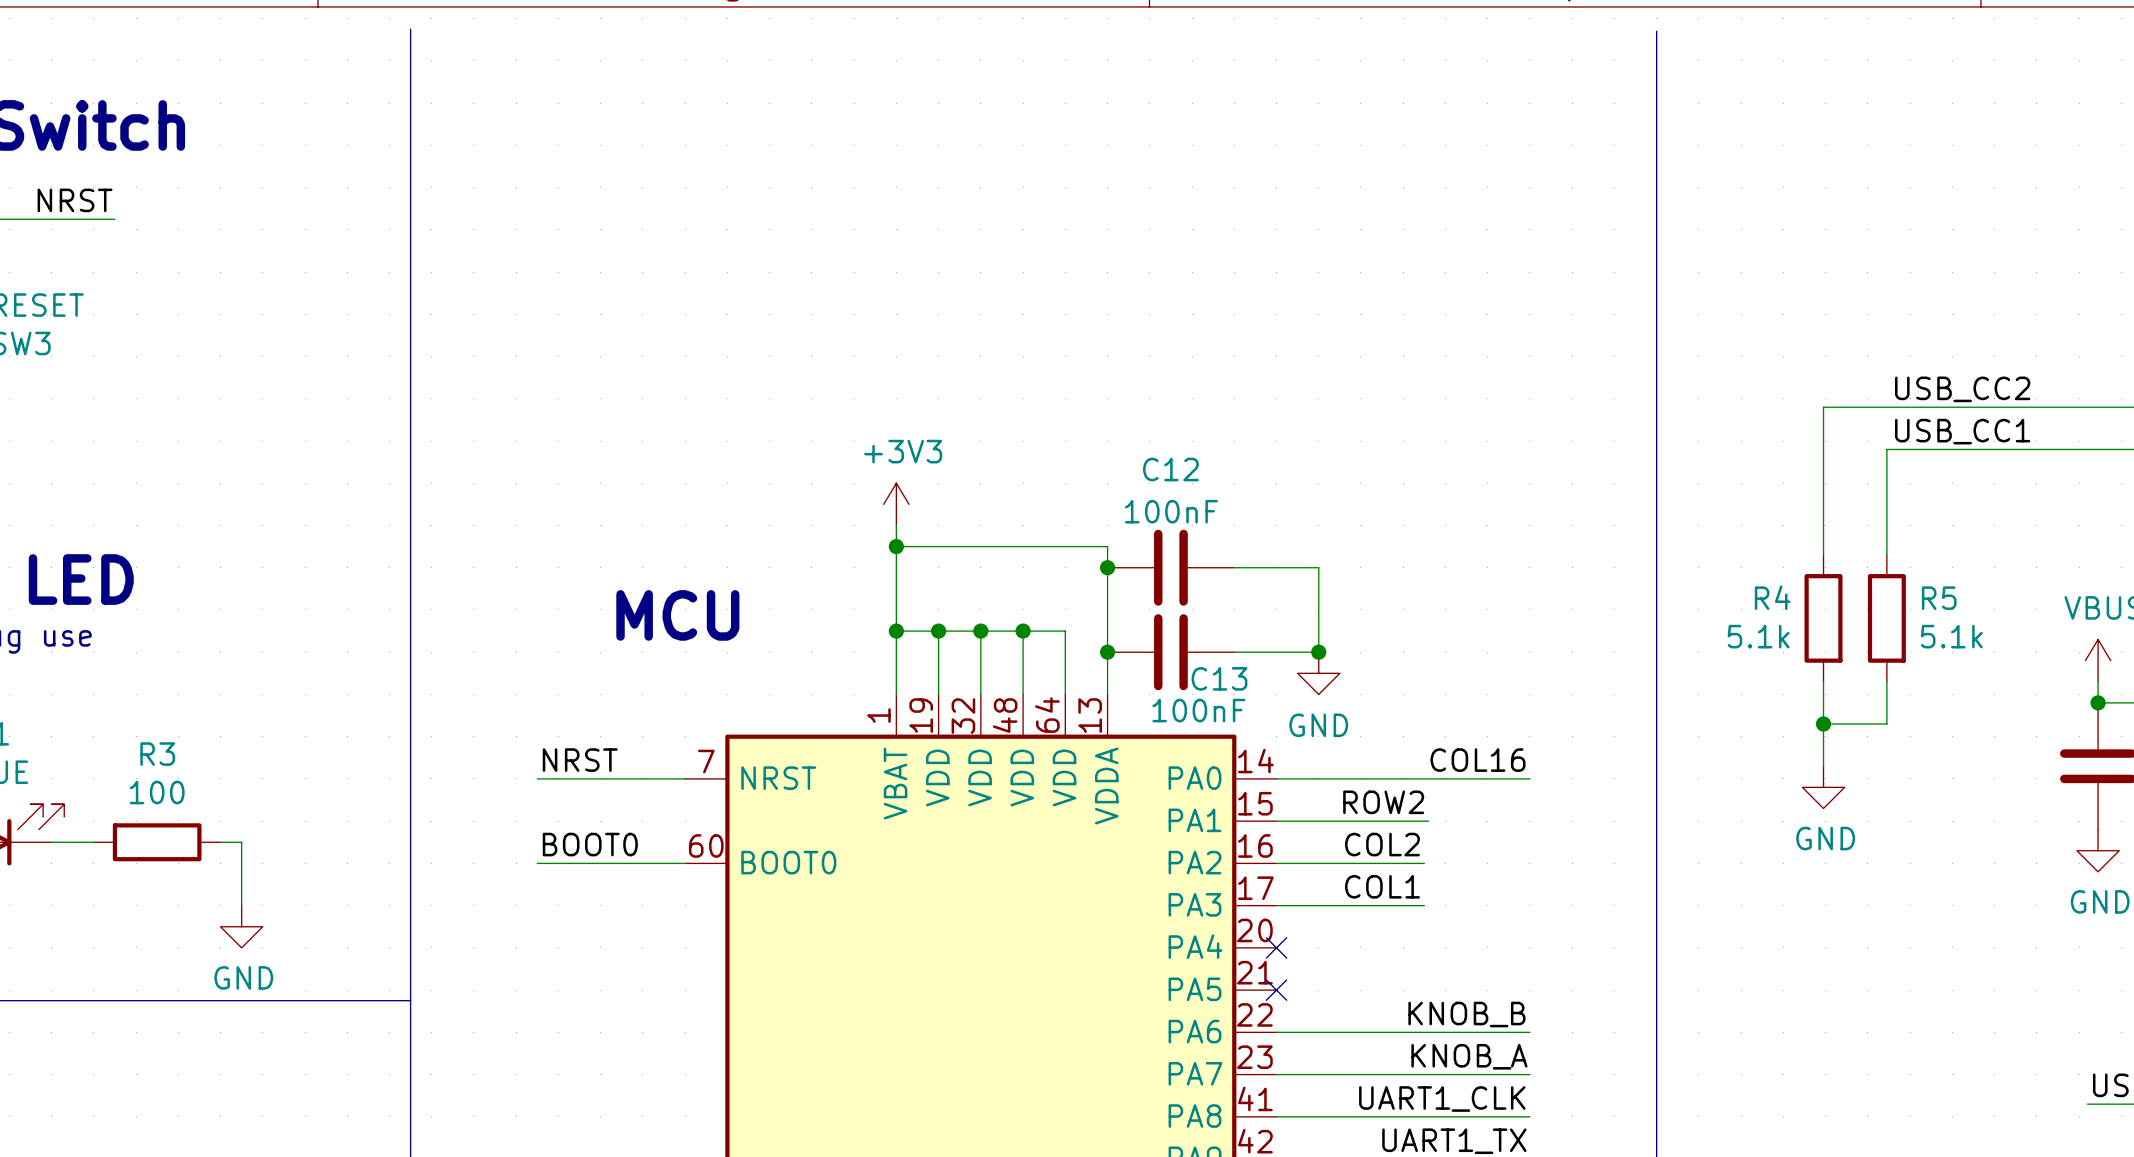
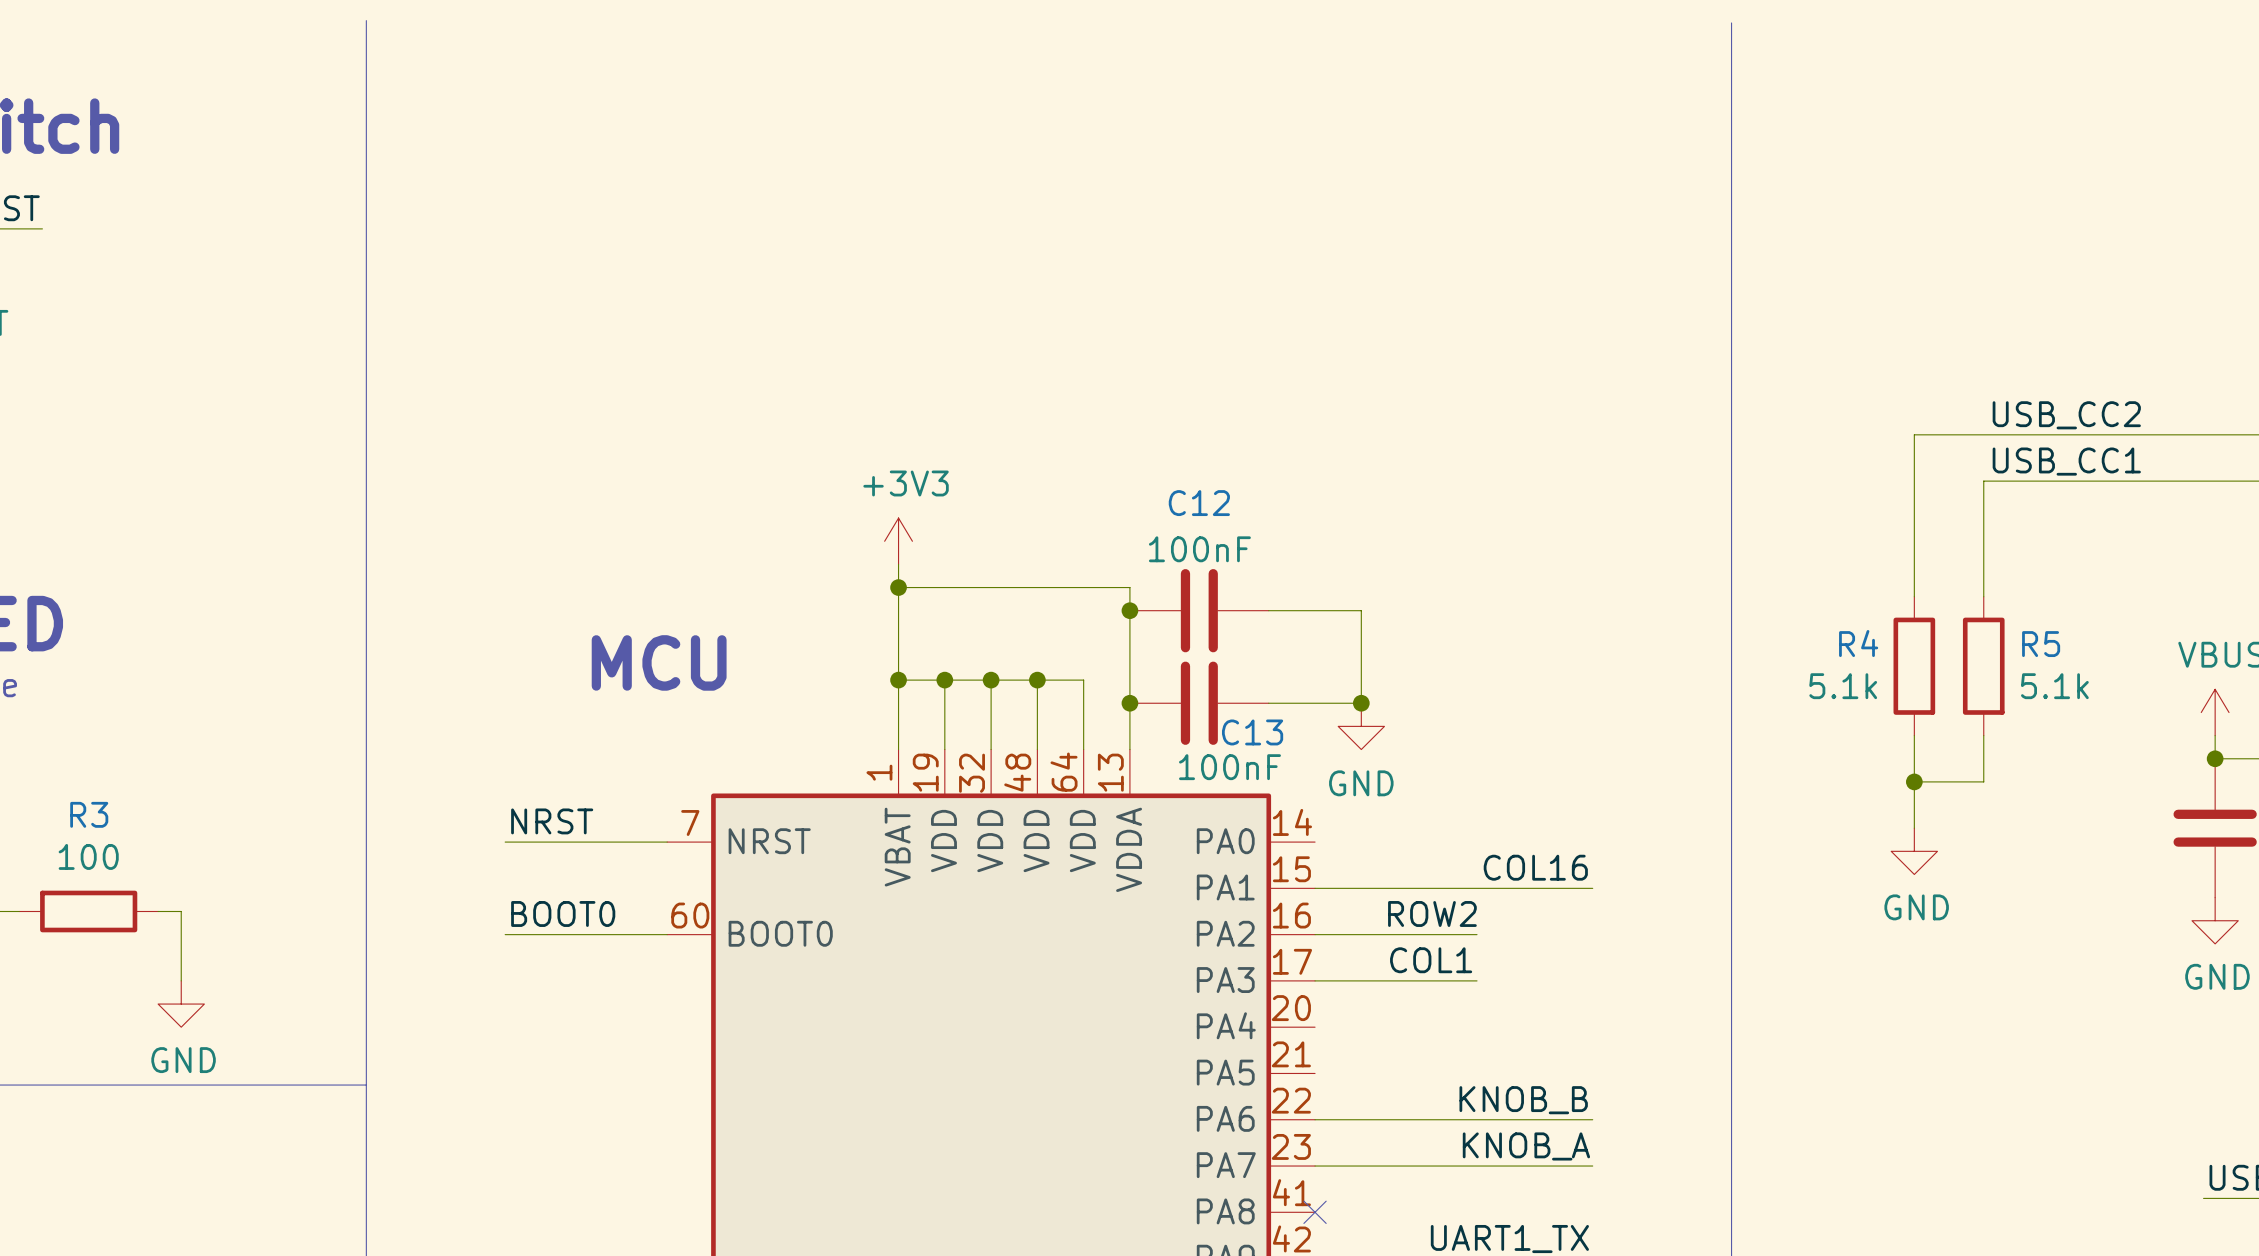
label position: COL16 (1478, 760) -> COL16 (1535, 867)
wire: (1276, 778) (1529, 778) -> none
label: ROW2 (1383, 802) -> none
wire: none -> (1481, 888) (1592, 888)
label: COL2 (1382, 844) -> ROW2 (1432, 913)
no-connect mark: (1276, 947) -> none
no-connect mark: (1276, 990) -> none
label: UART1_CLK (1442, 1098) -> none
wire: (1276, 1116) (1529, 1116) -> none
no-connect mark: none -> (1315, 1212)

